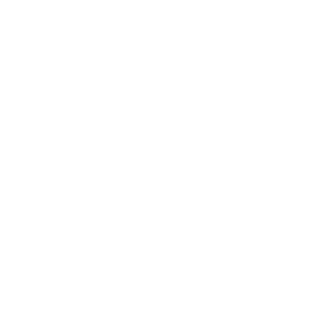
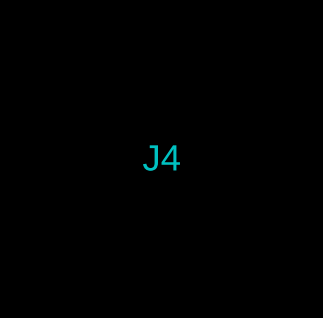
drawing: none -> [143, 145, 180, 171]

